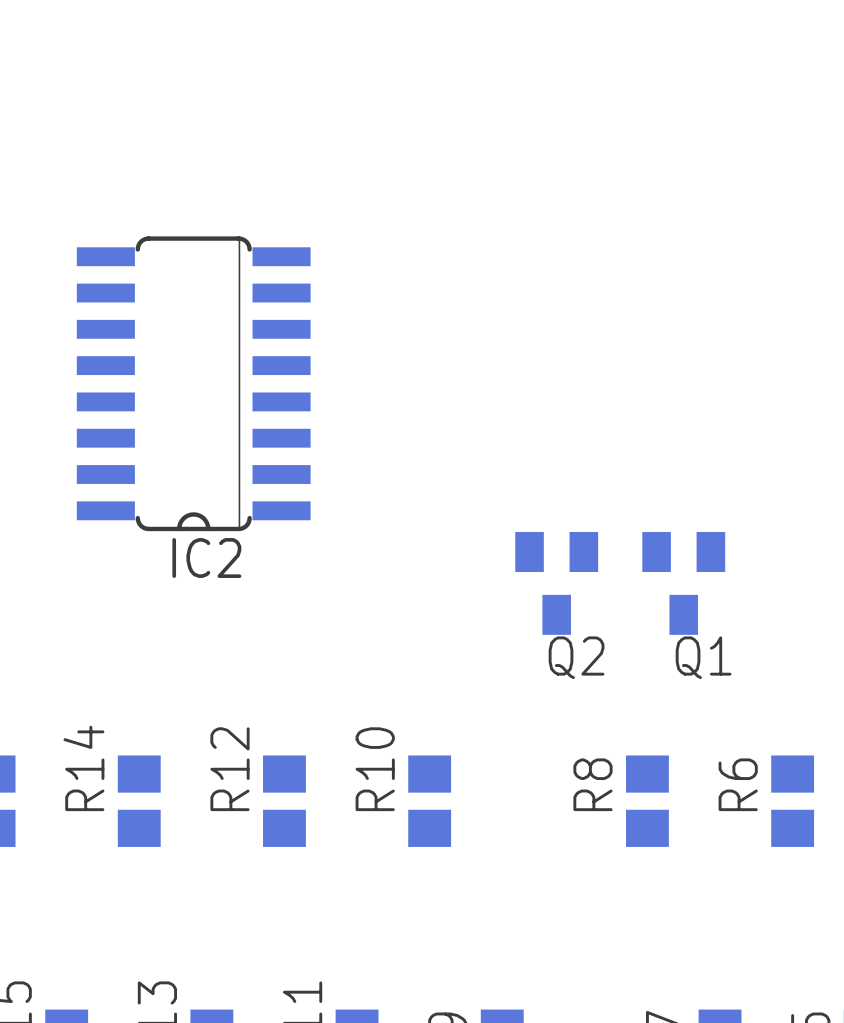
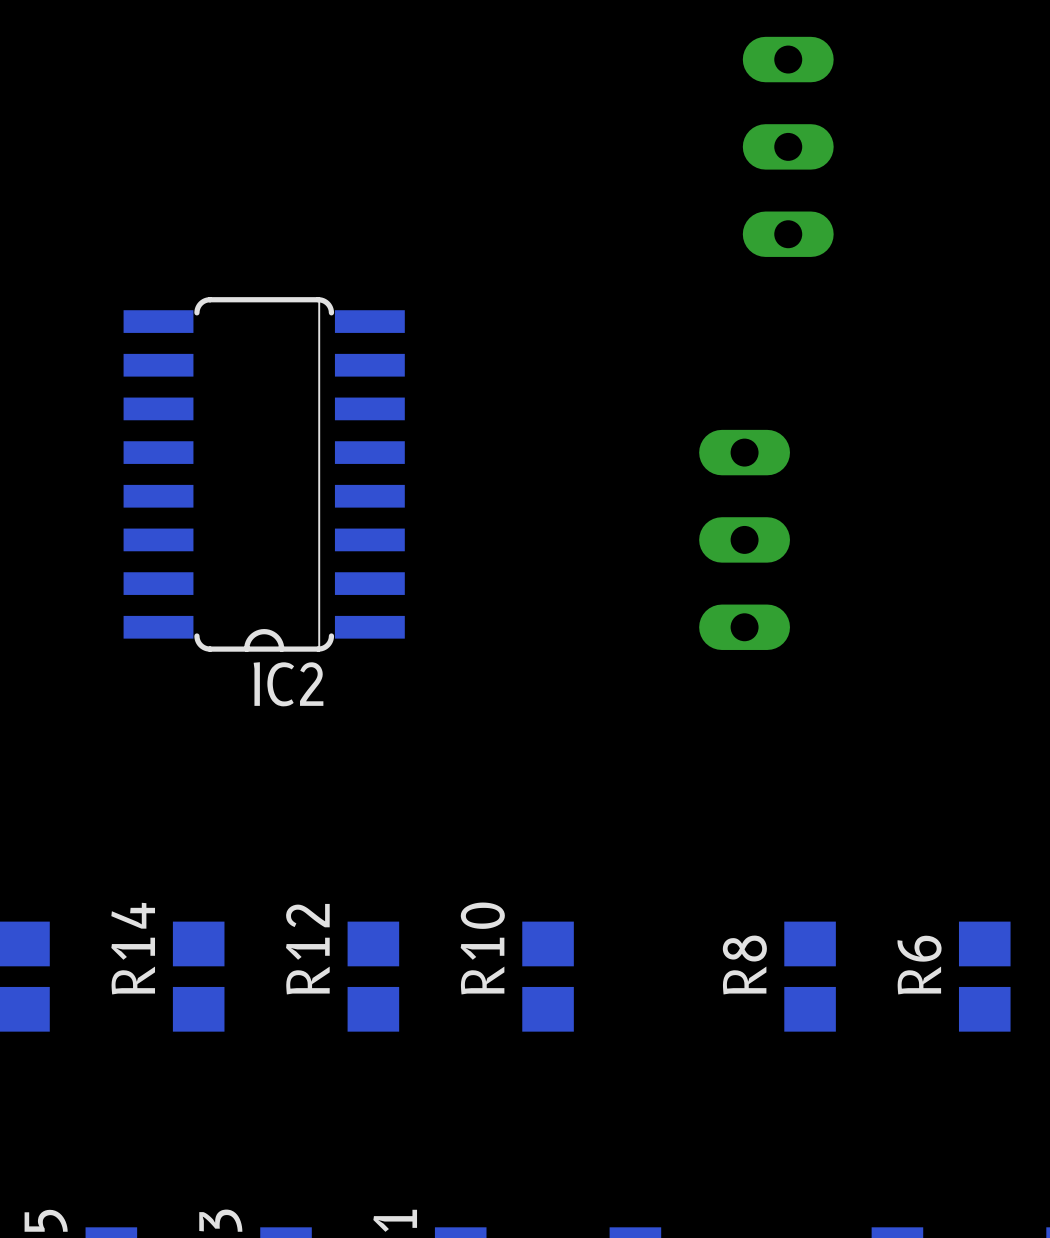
part: none -> (788, 146)
part: none -> (744, 539)
Q2: (556, 583) -> none
Q1: (683, 583) -> none

